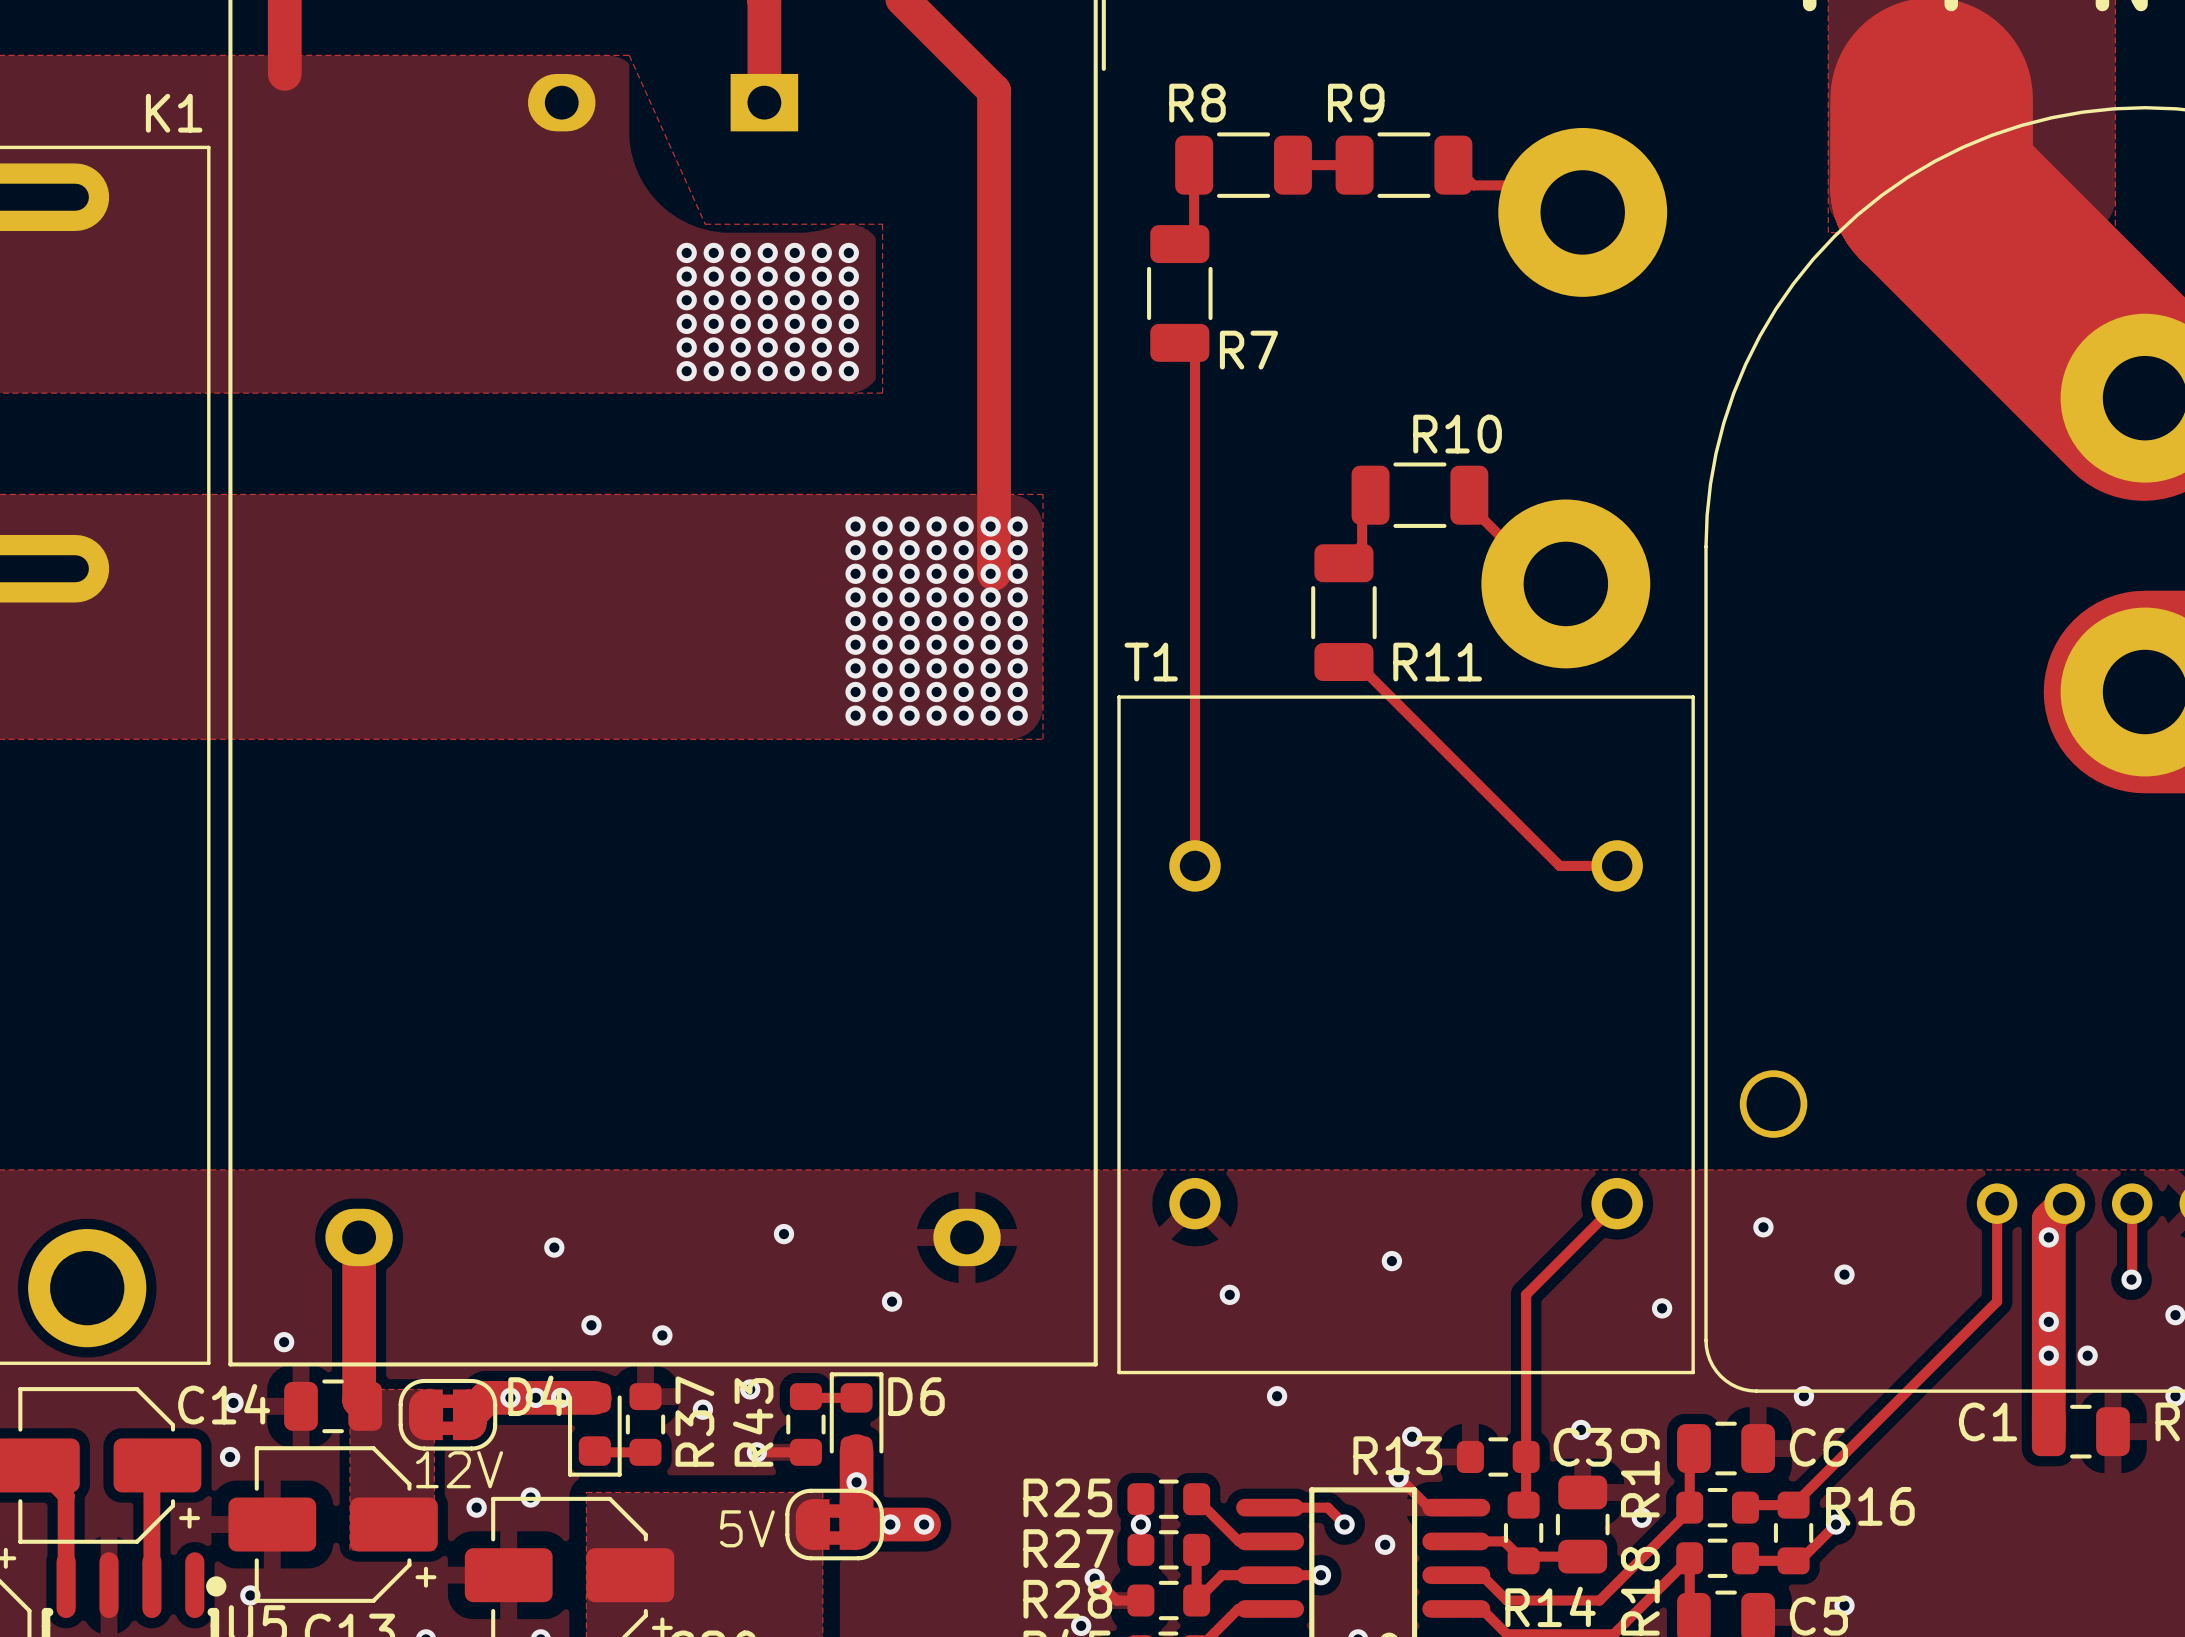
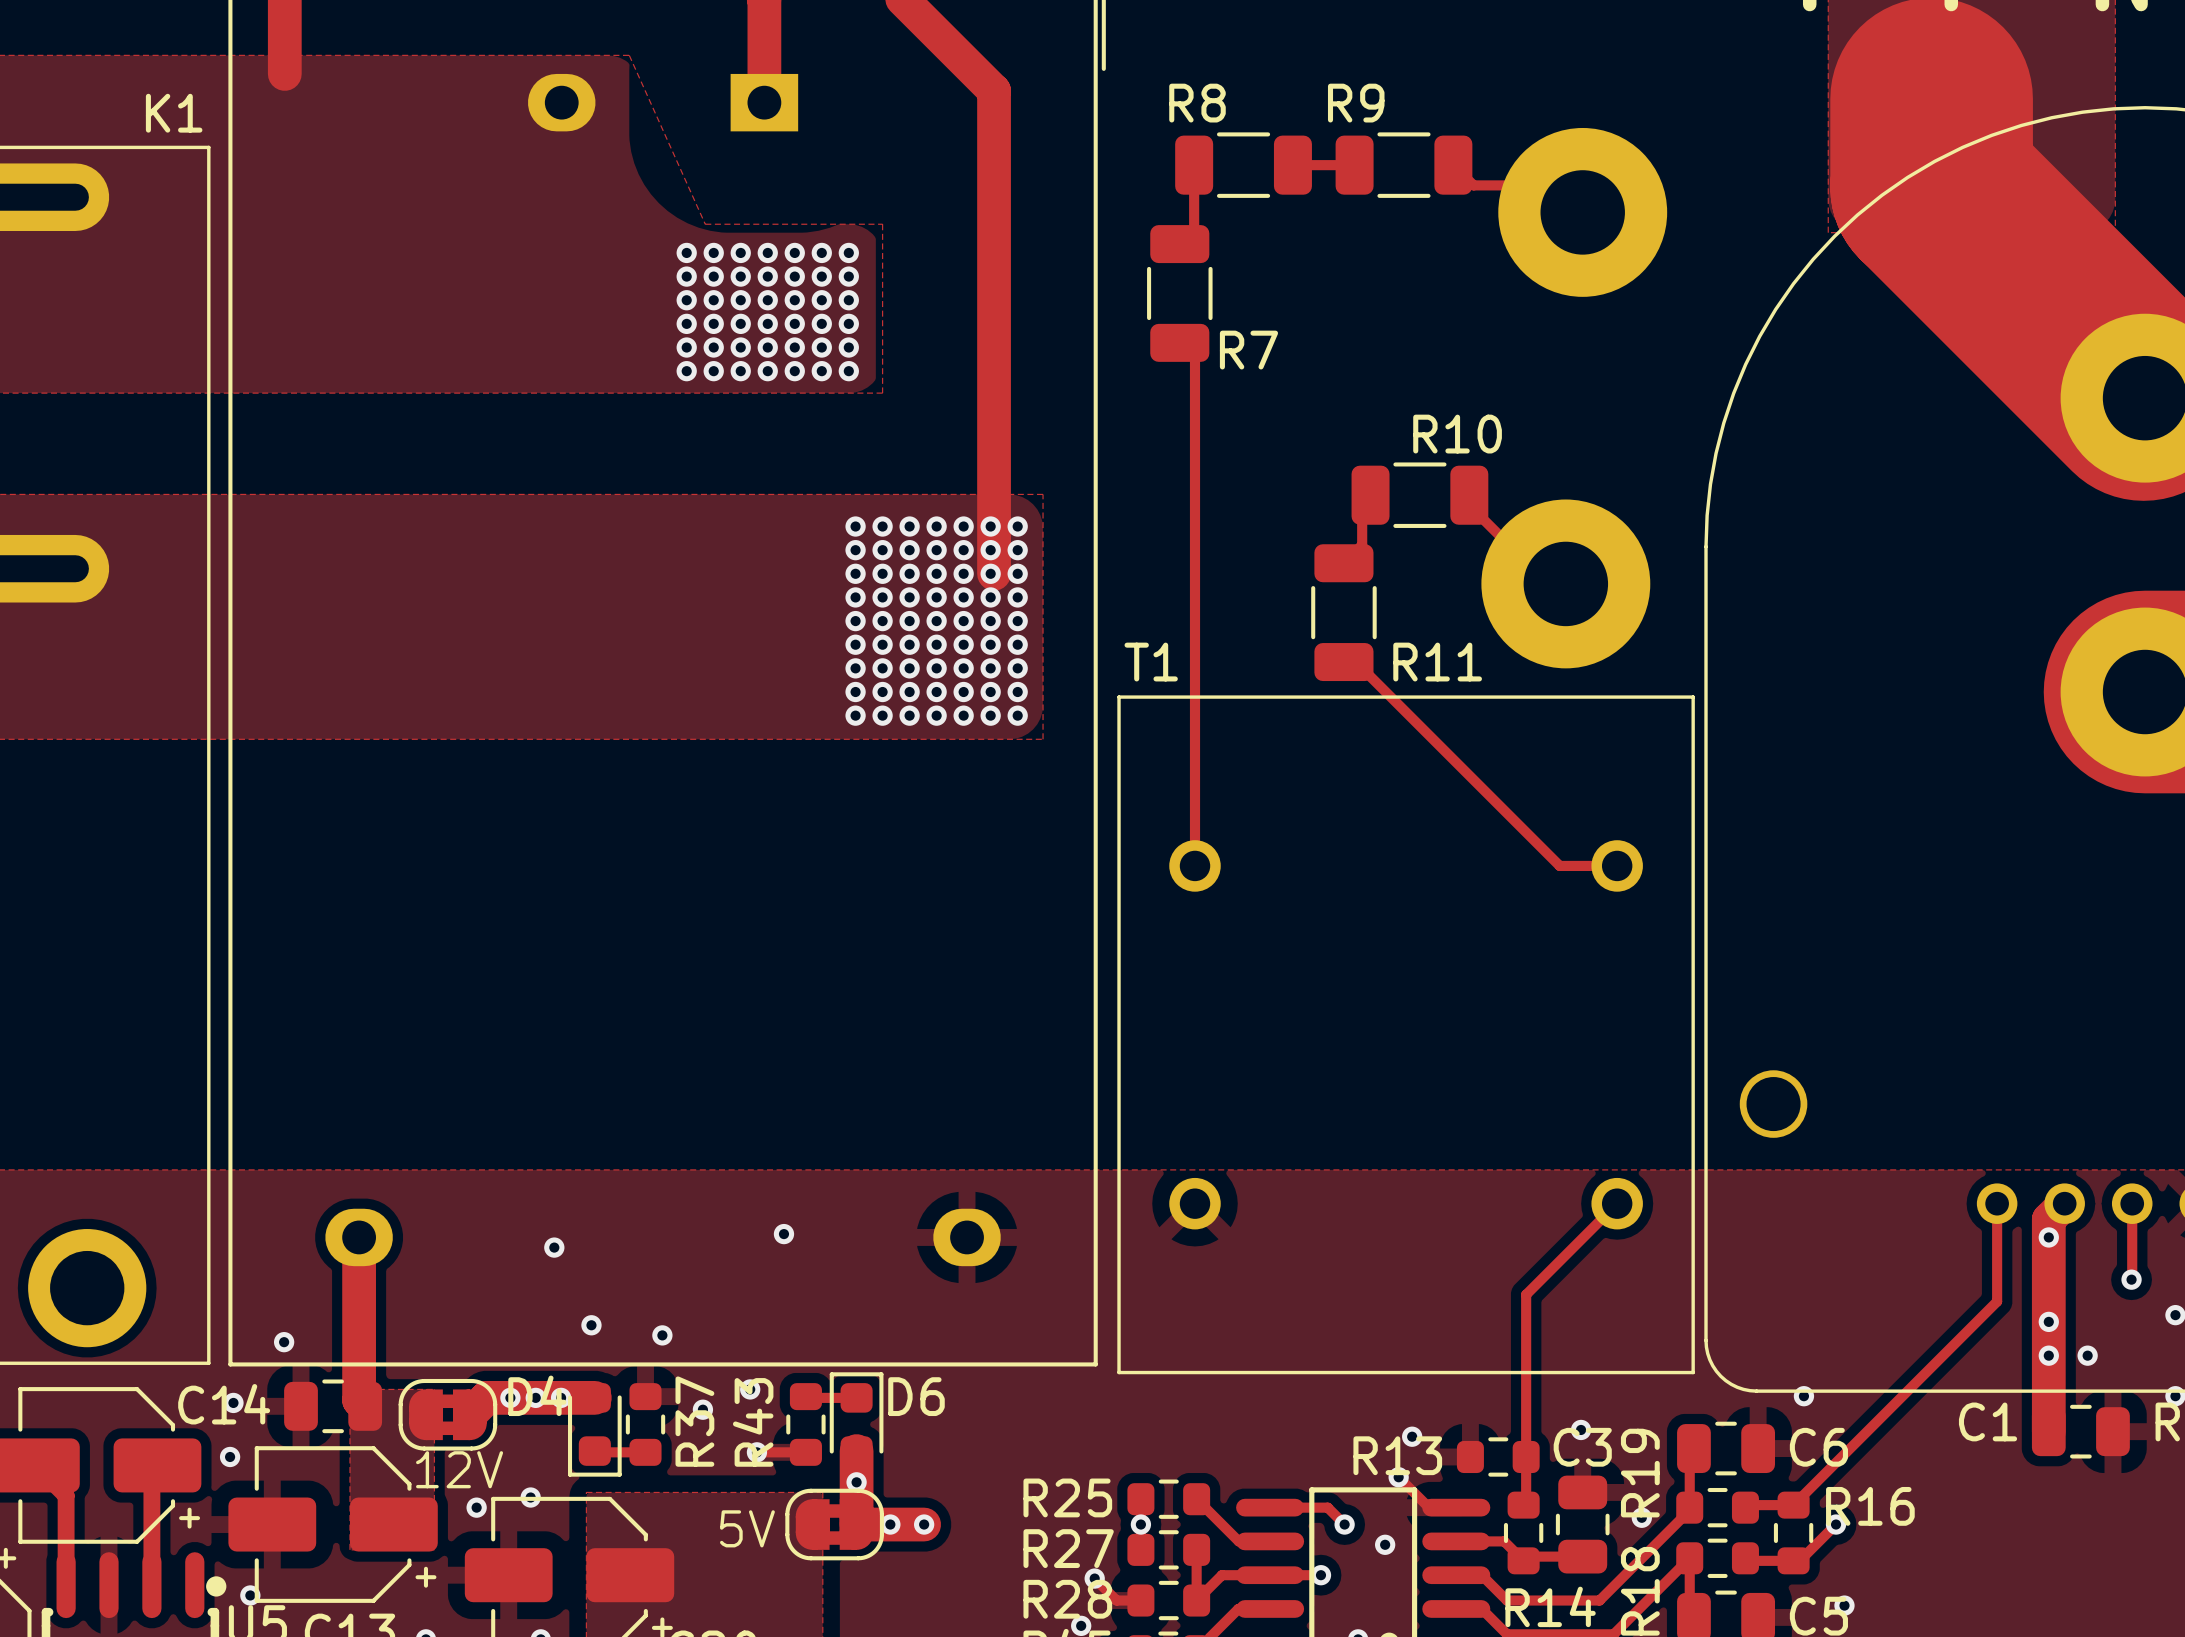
via: (1763, 1227) -> none
via: (1391, 1261) -> none
via: (1844, 1274) -> none
via: (1229, 1294) -> none
via: (892, 1301) -> none
via: (1662, 1308) -> none
via: (1277, 1396) -> none

